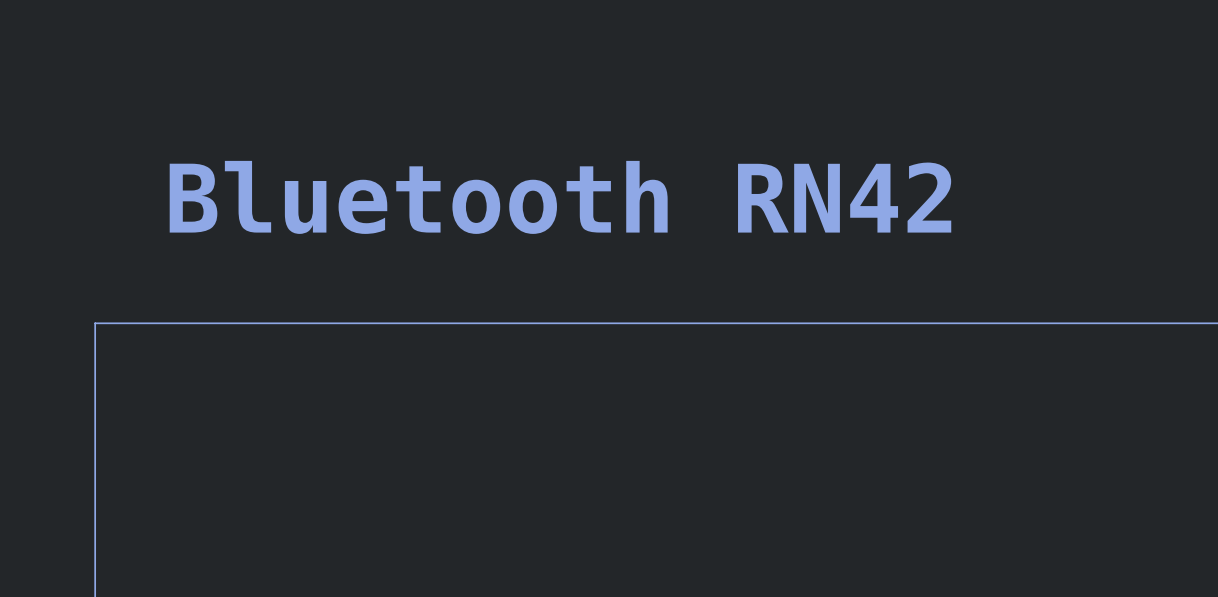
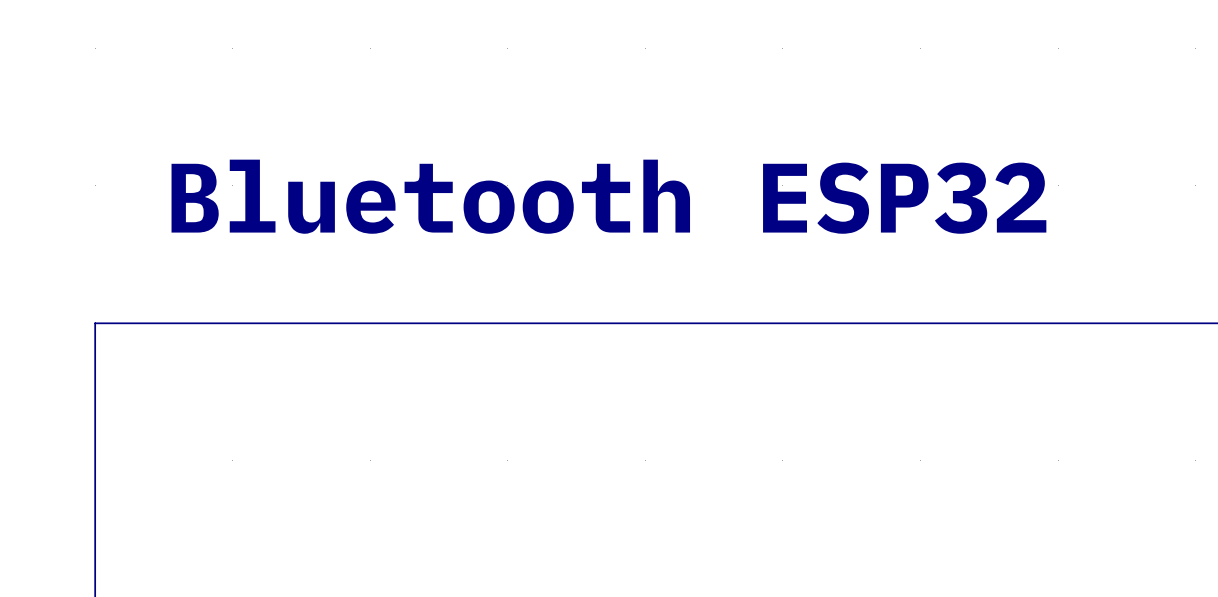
text: Bluetooth RN42 (560, 197) -> Bluetooth ESP32 (608, 196)

